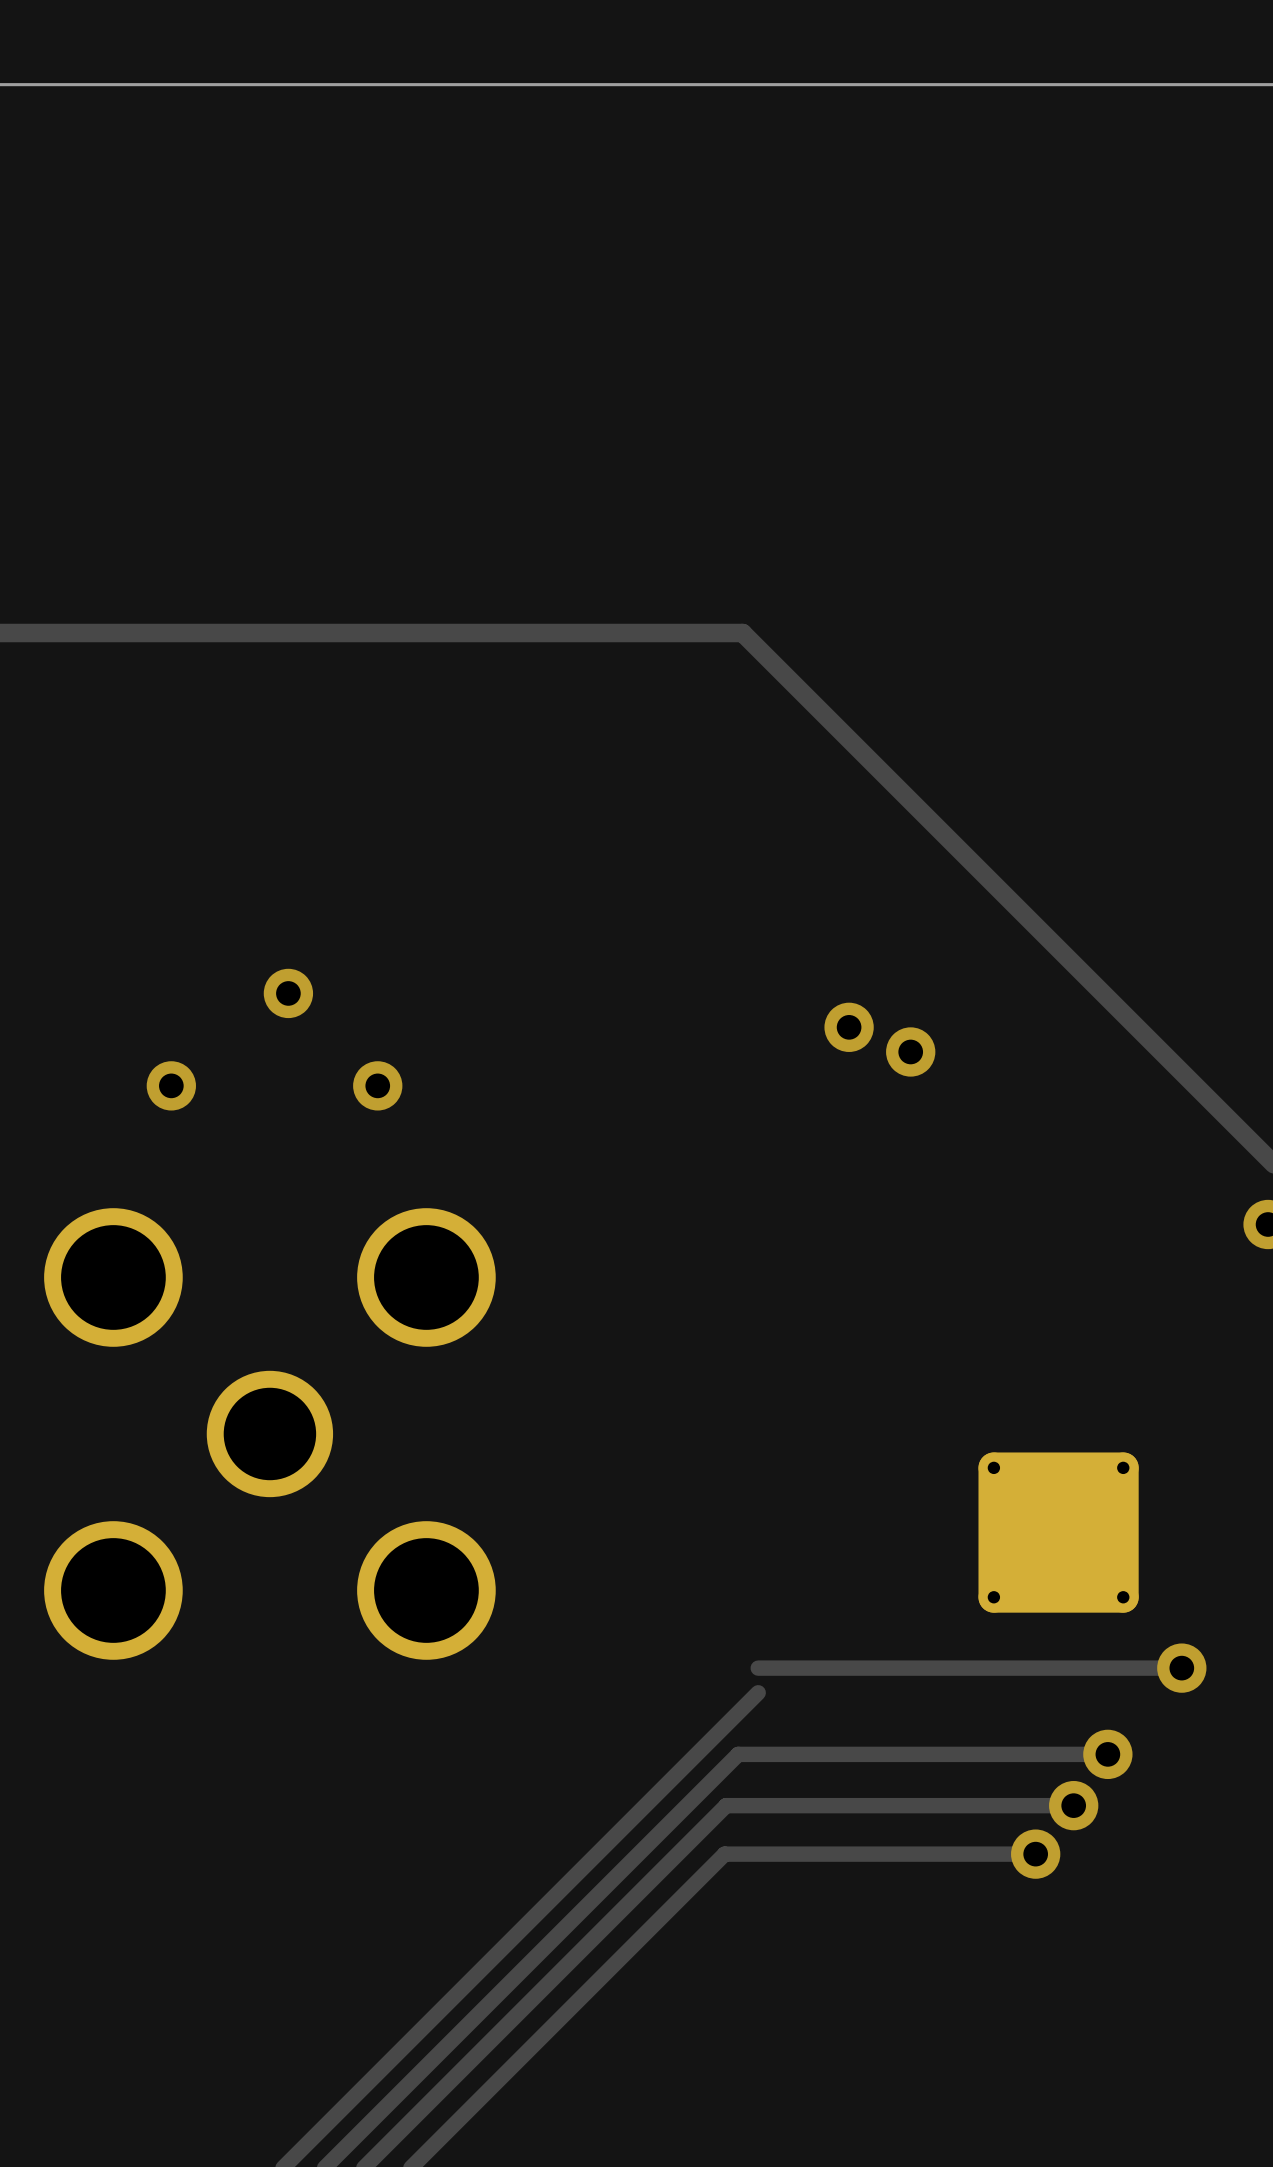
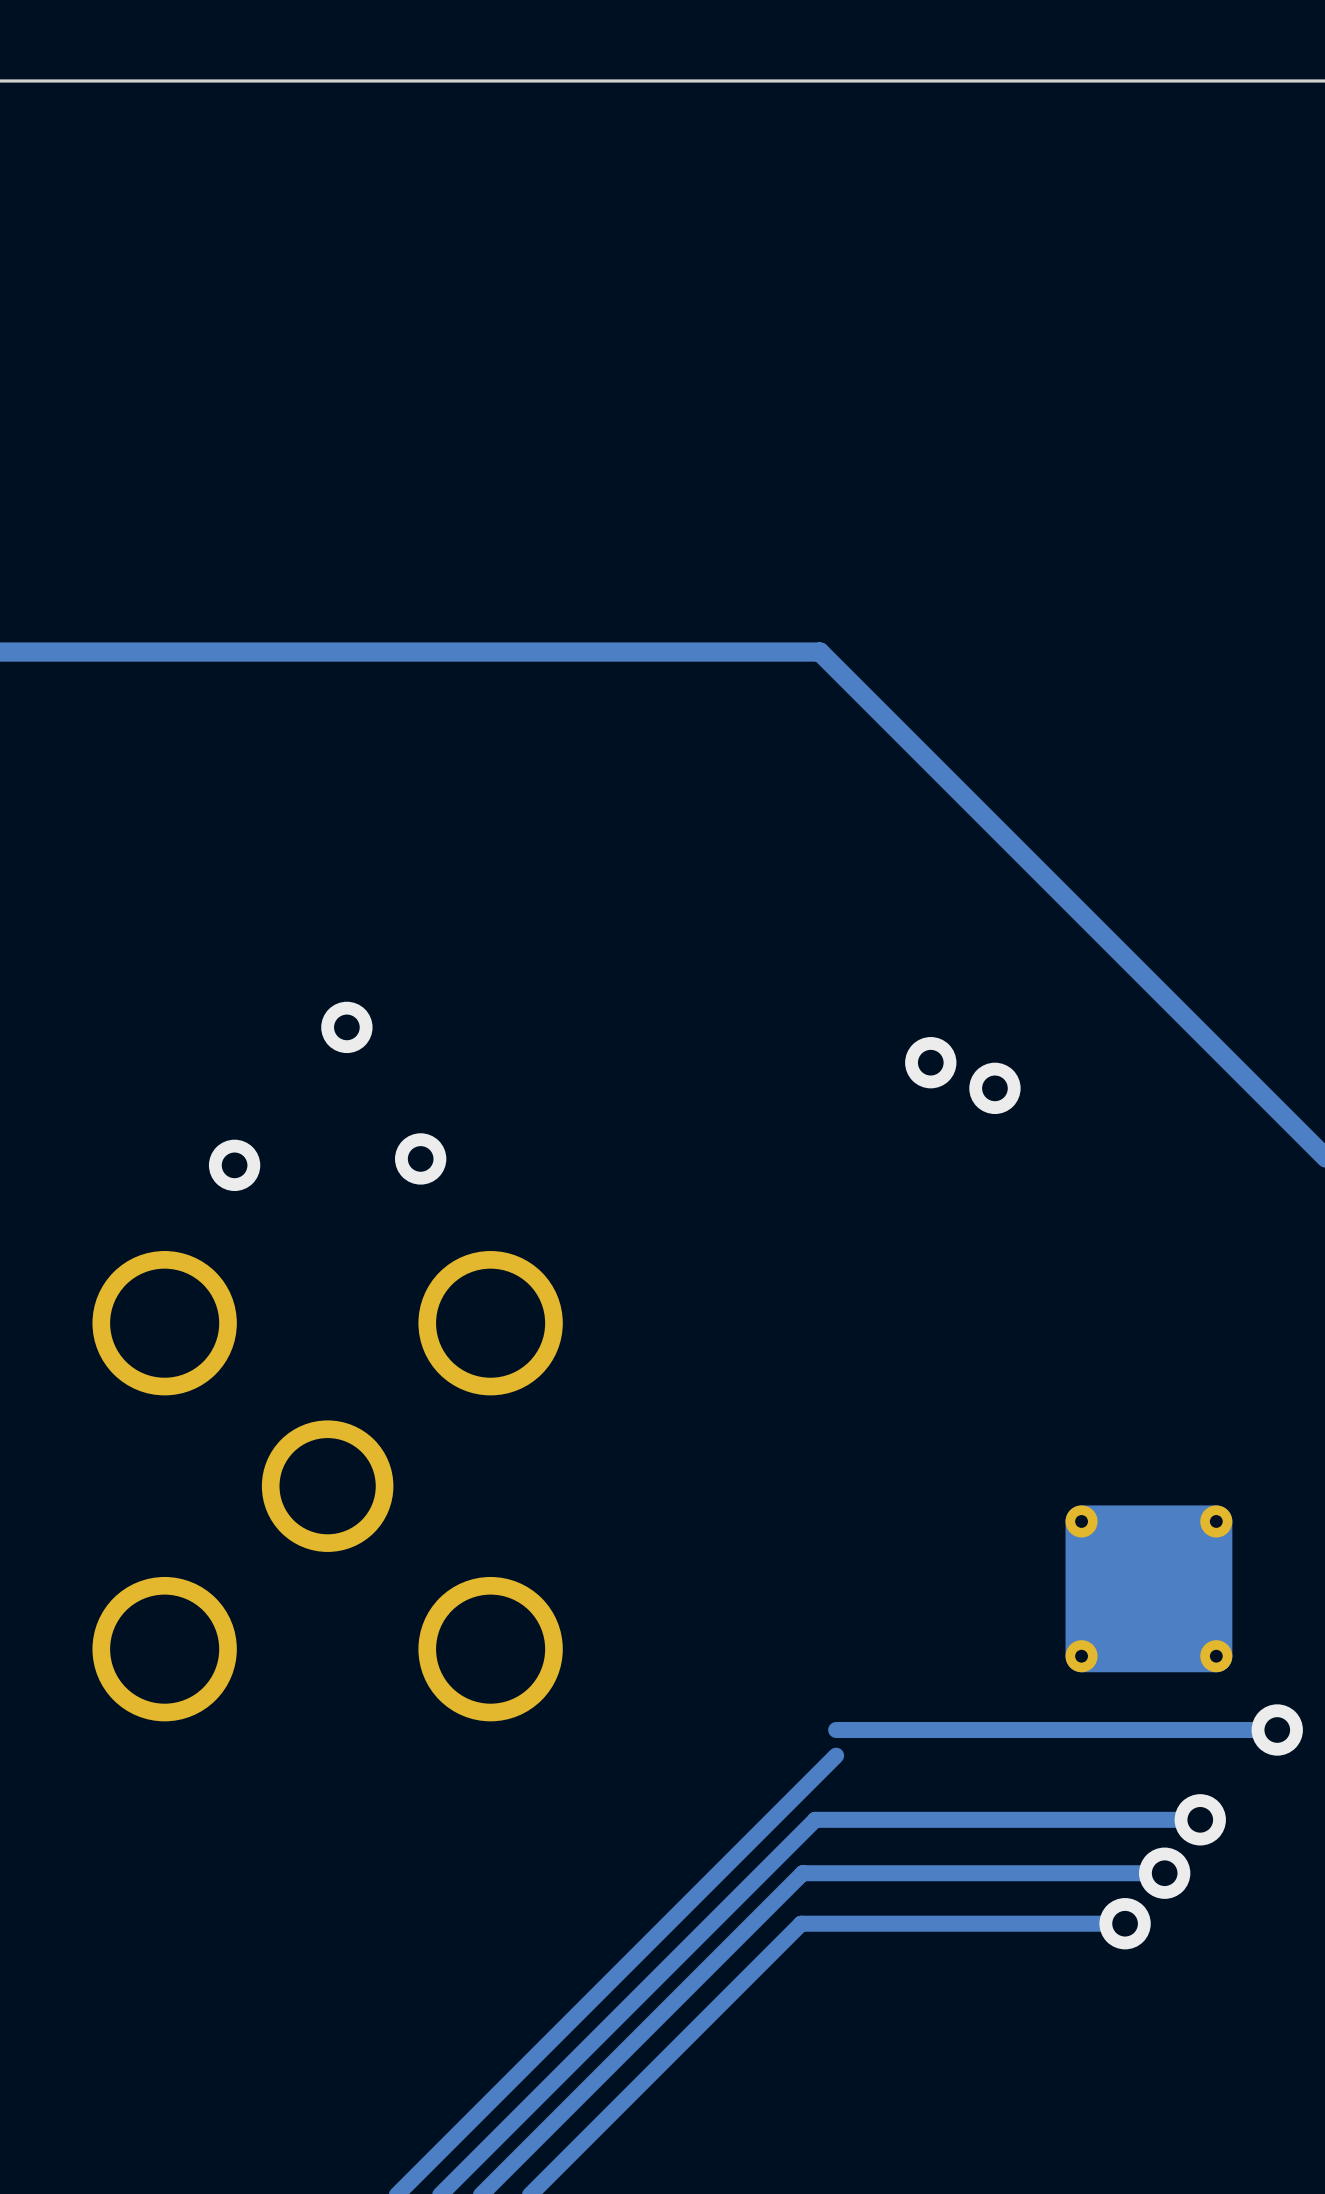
via position: (171, 1085) -> (234, 1165)
via position: (377, 1085) -> (420, 1158)

